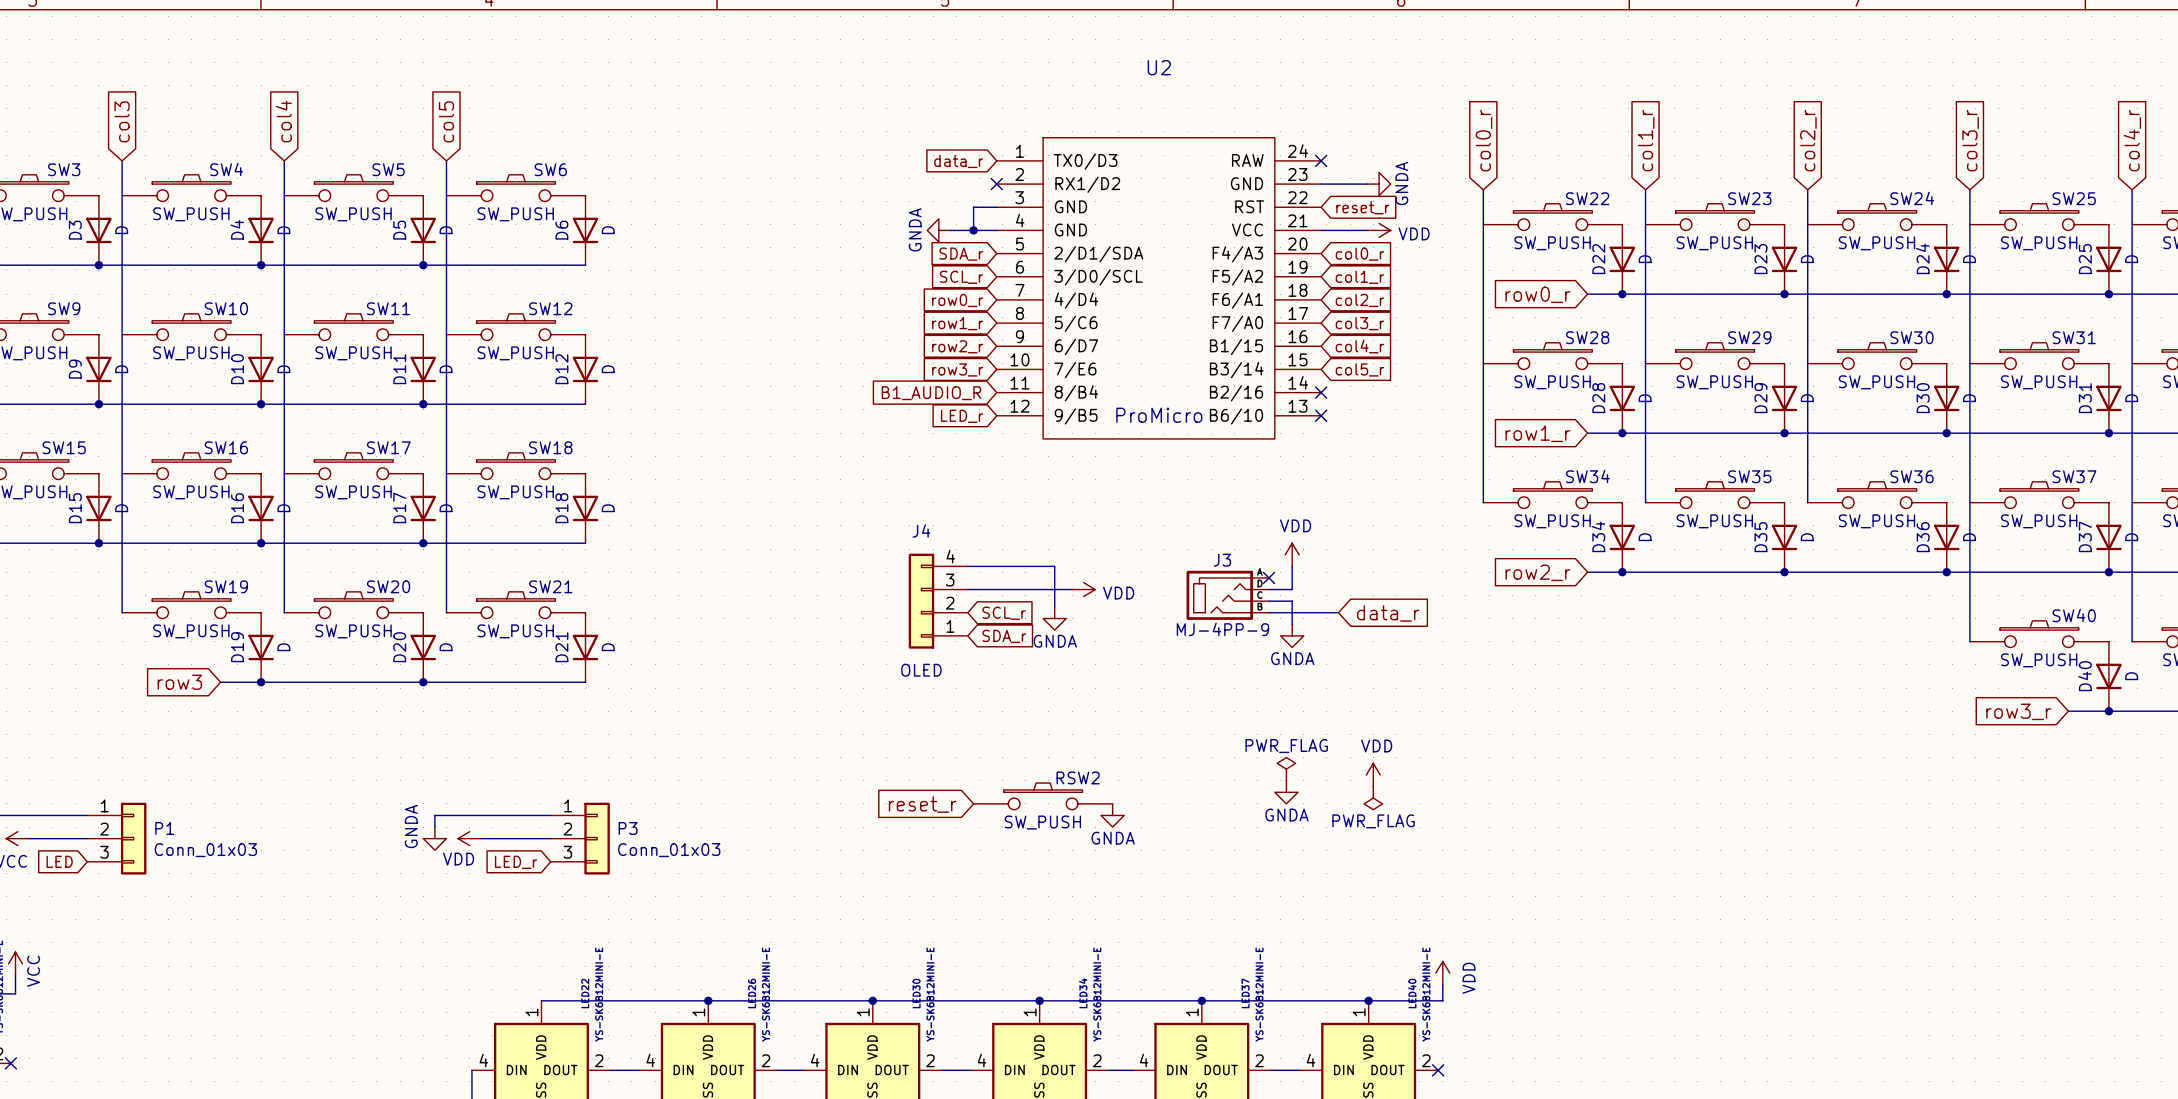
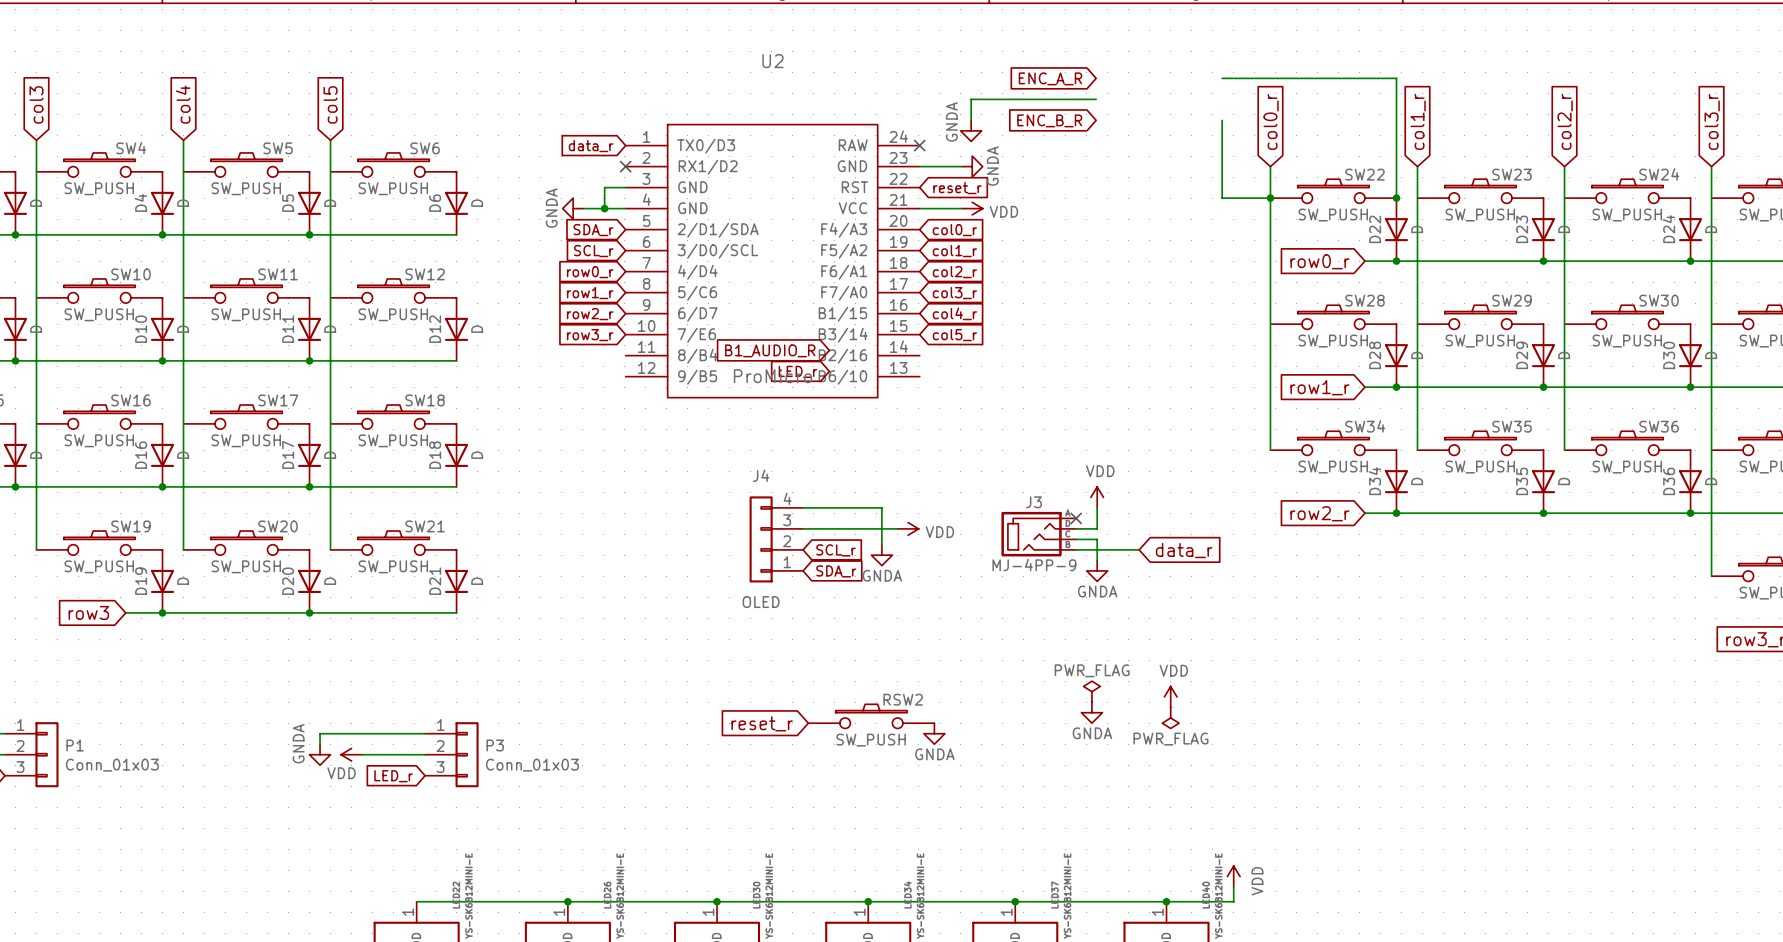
wire: none -> (1222, 78) (1396, 78) (1396, 198)
global label: none -> ENC_A_R (1050, 78)
wire: none -> (1096, 99) (971, 99) (971, 120)
wire: none -> (1222, 120) (1222, 198) (1270, 198)
global label: none -> ENC_B_R (1049, 120)
power symbol: none -> GNDA (971, 130)
no-connect mark: (1321, 160) -> none
global label position: data_r (958, 161) -> data_r (591, 146)
no-connect mark: none -> (919, 145)
no-connect mark: (996, 184) -> none
wire: (1321, 184) (1367, 184) -> (919, 166) (961, 166)
power symbol: GNDA (1379, 184) -> none
no-connect mark: none -> (625, 166)
power symbol: none -> GNDA (972, 166)
wire: (996, 207) (973, 207) (973, 230) -> (625, 187) (604, 187) (604, 208)
global label position: reset_r (1362, 207) -> reset_r (957, 188)
junction: none -> (1270, 198)
junction: none -> (1396, 198)
power symbol: GNDA (938, 230) -> none
wire: (950, 230) (996, 230) -> (583, 208) (625, 208)
junction: (973, 230) -> none
wire: (1321, 230) (1367, 230) -> (919, 208) (961, 208)
power symbol position: VDD (1379, 230) -> VDD (972, 208)
power symbol: none -> GNDA (573, 208)
junction: none -> (604, 208)
global label position: SDA_r (961, 254) -> SDA_r (593, 230)
global label position: col0_r (1359, 254) -> col0_r (954, 230)
global label position: SCL_r (961, 277) -> SCL_r (593, 251)
global label position: col1_r (1359, 277) -> col1_r (954, 251)
U2 position: (1158, 288) -> (772, 261)
global label position: row0_r (957, 300) -> row0_r (590, 272)
global label position: col2_r (1359, 300) -> col2_r (954, 272)
global label position: row1_r (957, 323) -> row1_r (590, 293)
global label position: col3_r (1359, 323) -> col3_r (954, 293)
global label position: row2_r (957, 346) -> row2_r (590, 314)
global label position: col4_r (1359, 346) -> col4_r (954, 313)
global label position: row3_r (957, 369) -> row3_r (590, 335)
global label position: col5_r (1359, 369) -> col5_r (954, 335)
no-connect mark: (1321, 392) -> none
no-connect mark: (1321, 415) -> none

